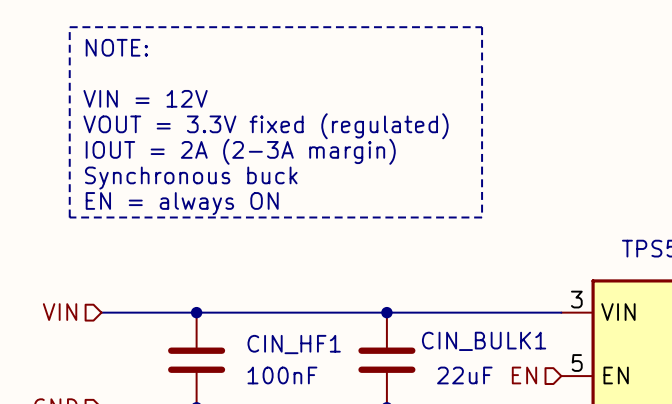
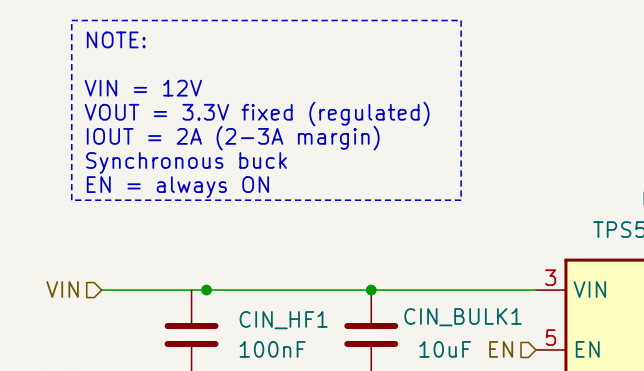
junction position: (196, 312) -> (206, 290)
CIN_BULK1 value: 22uF (464, 375) -> 10uF (445, 349)

